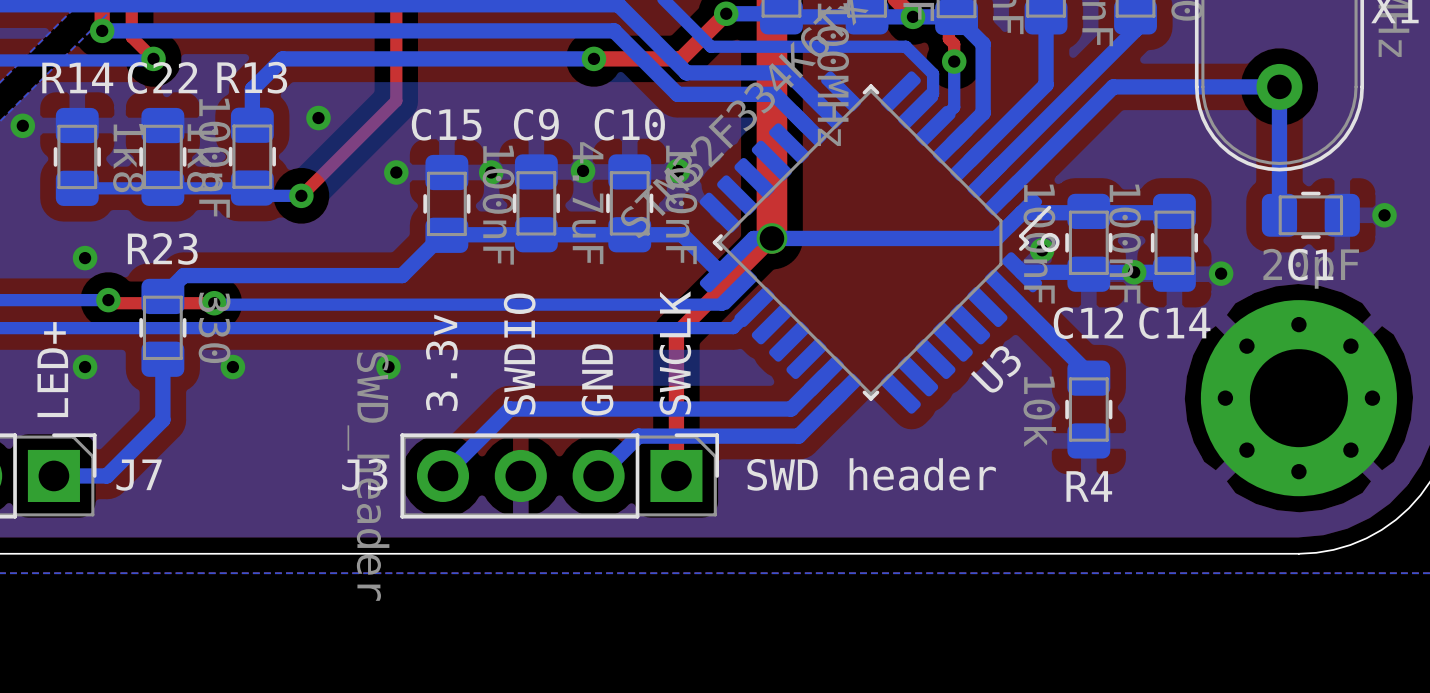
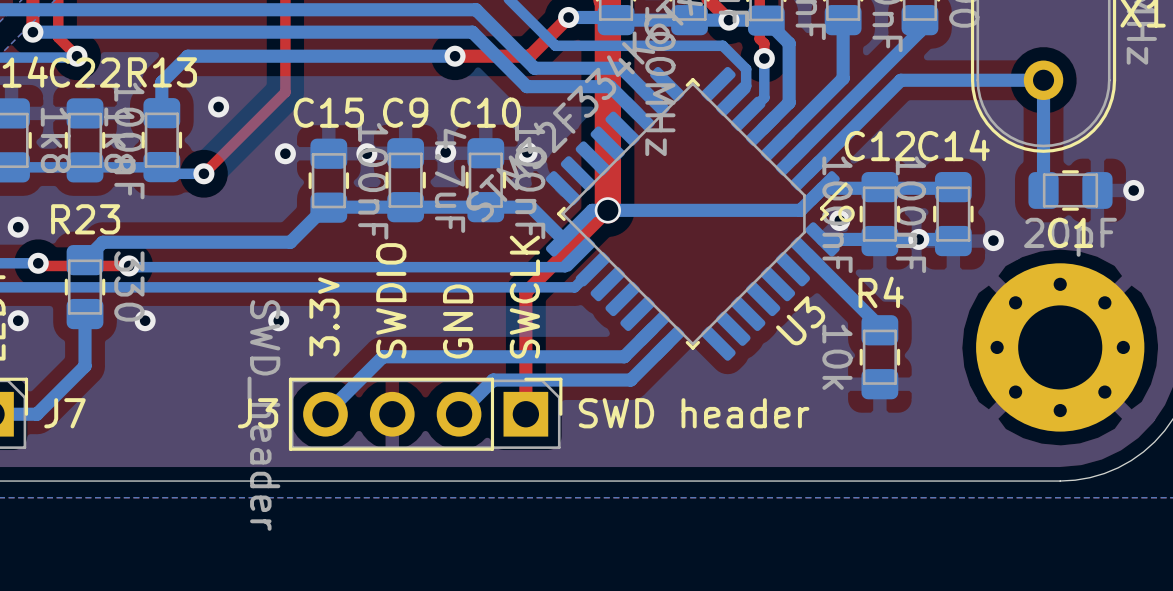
C12 name position: C12 (1088, 323) -> C12 (879, 146)
C14 name position: C14 (1174, 323) -> C14 (953, 145)
R4 name position: R4 (1089, 486) -> R4 (881, 292)

